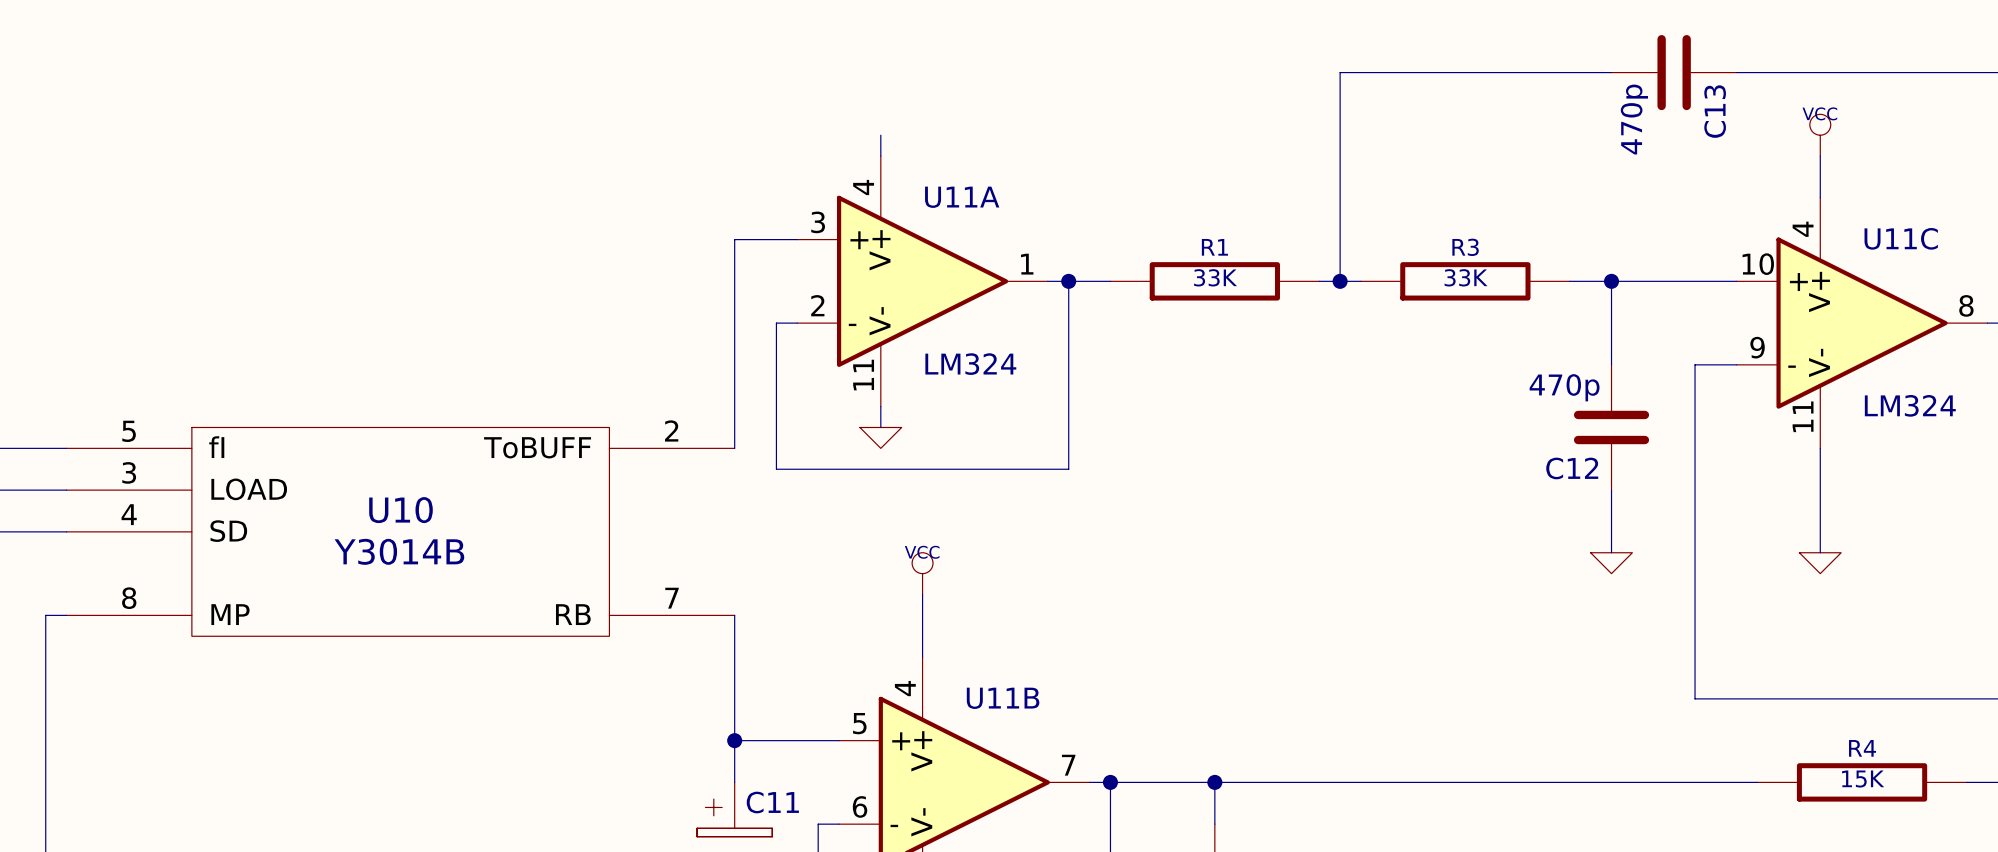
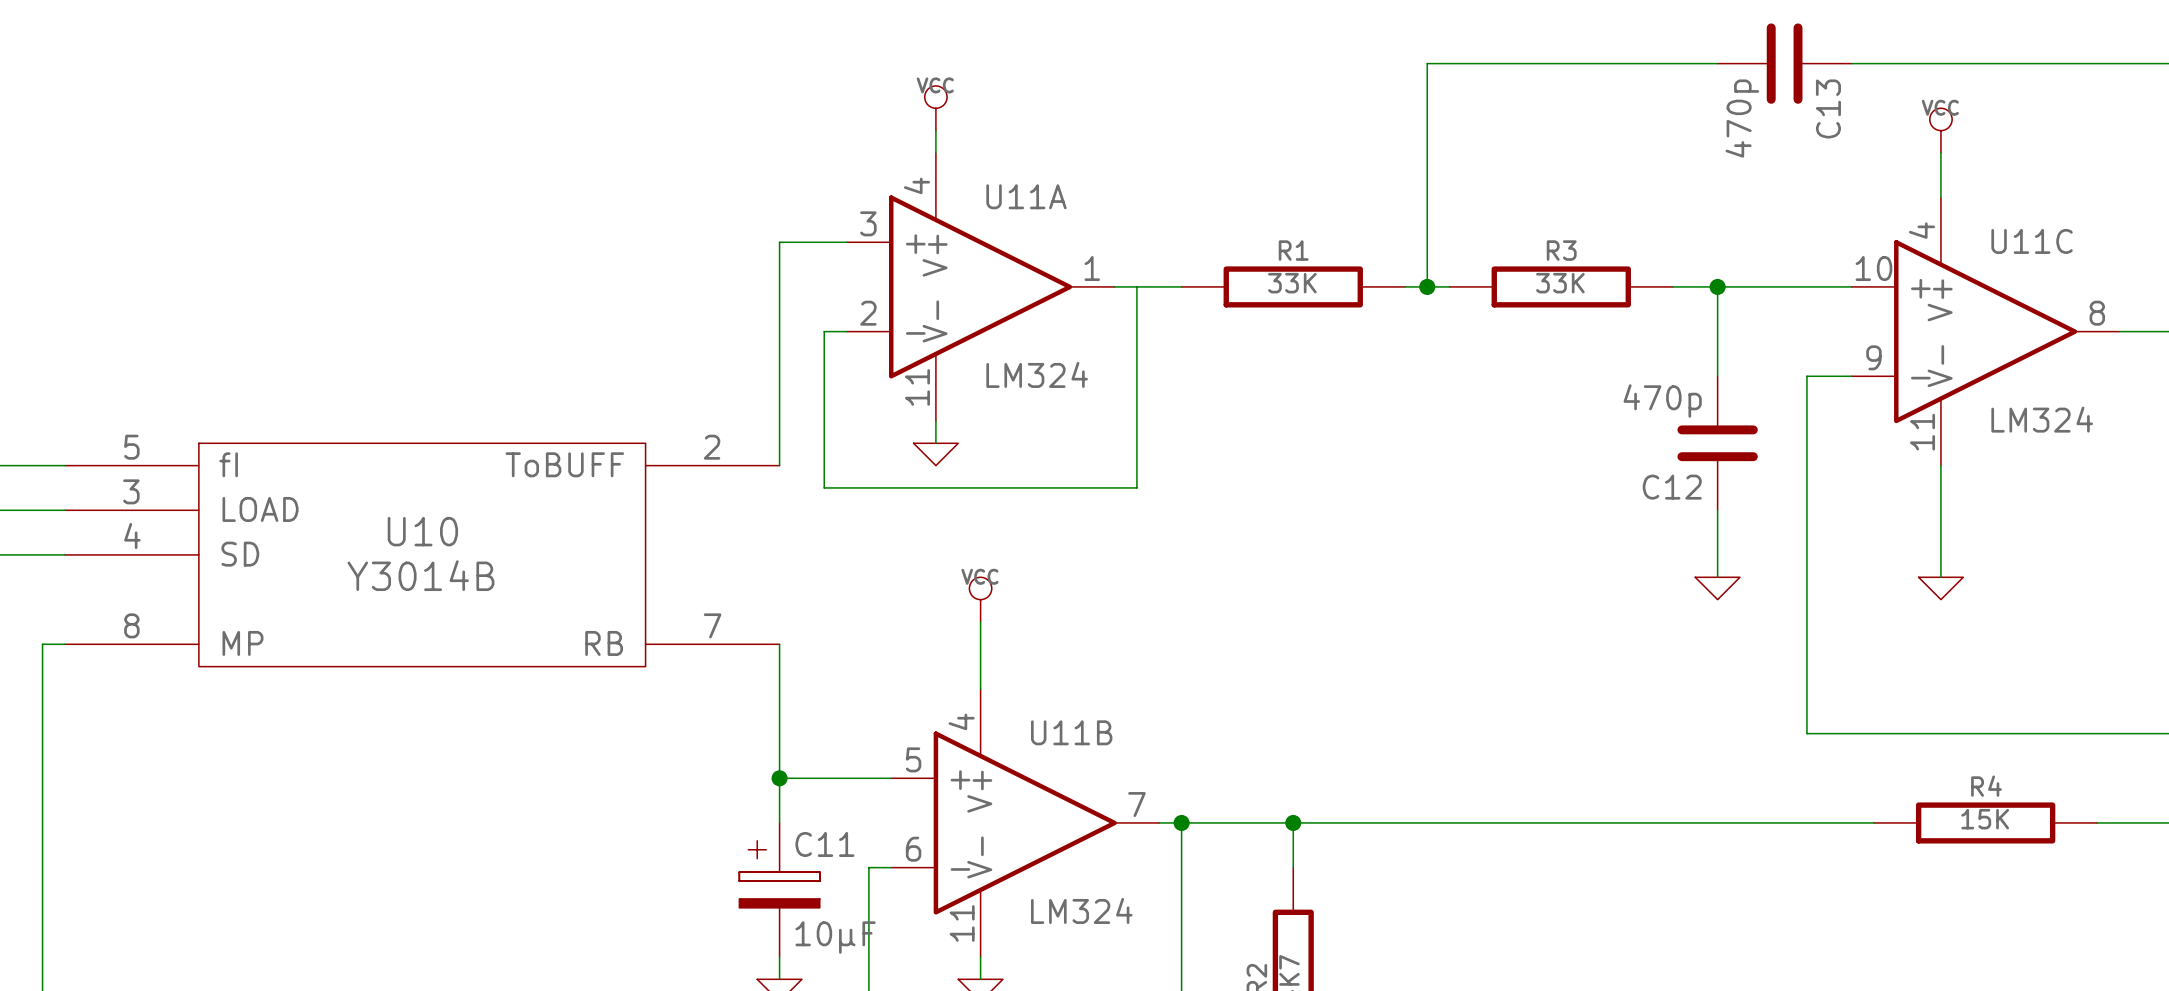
power symbol: none -> VCC (935, 108)
junction: (1068, 281) -> none

